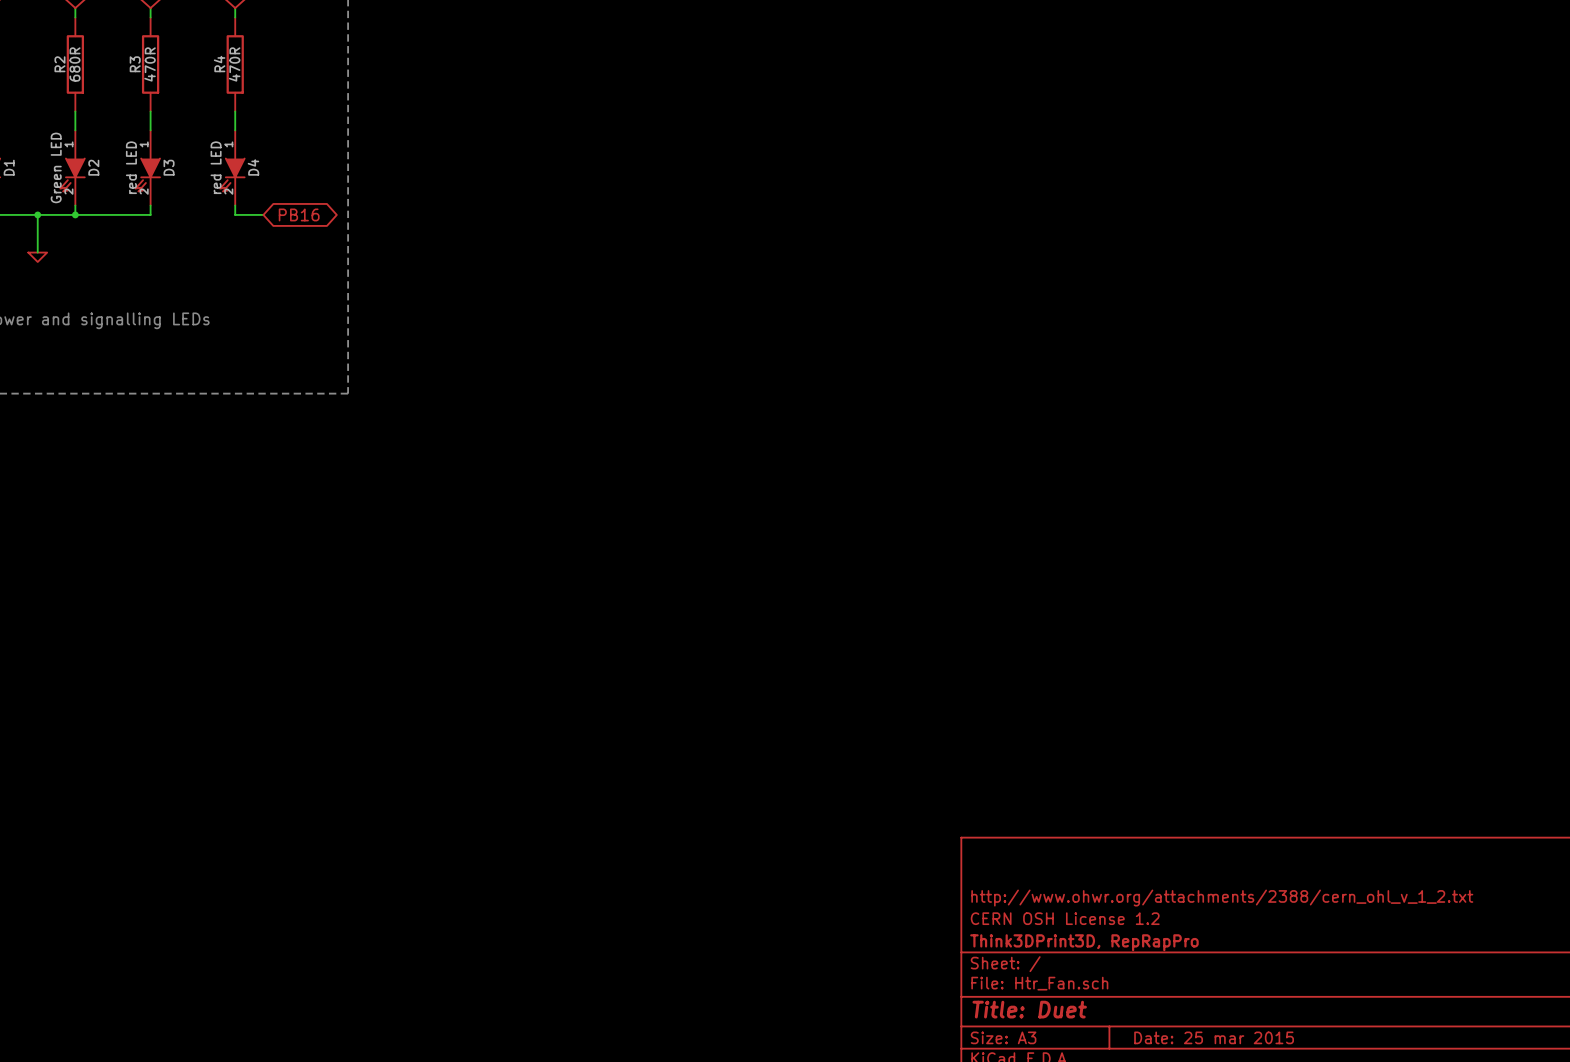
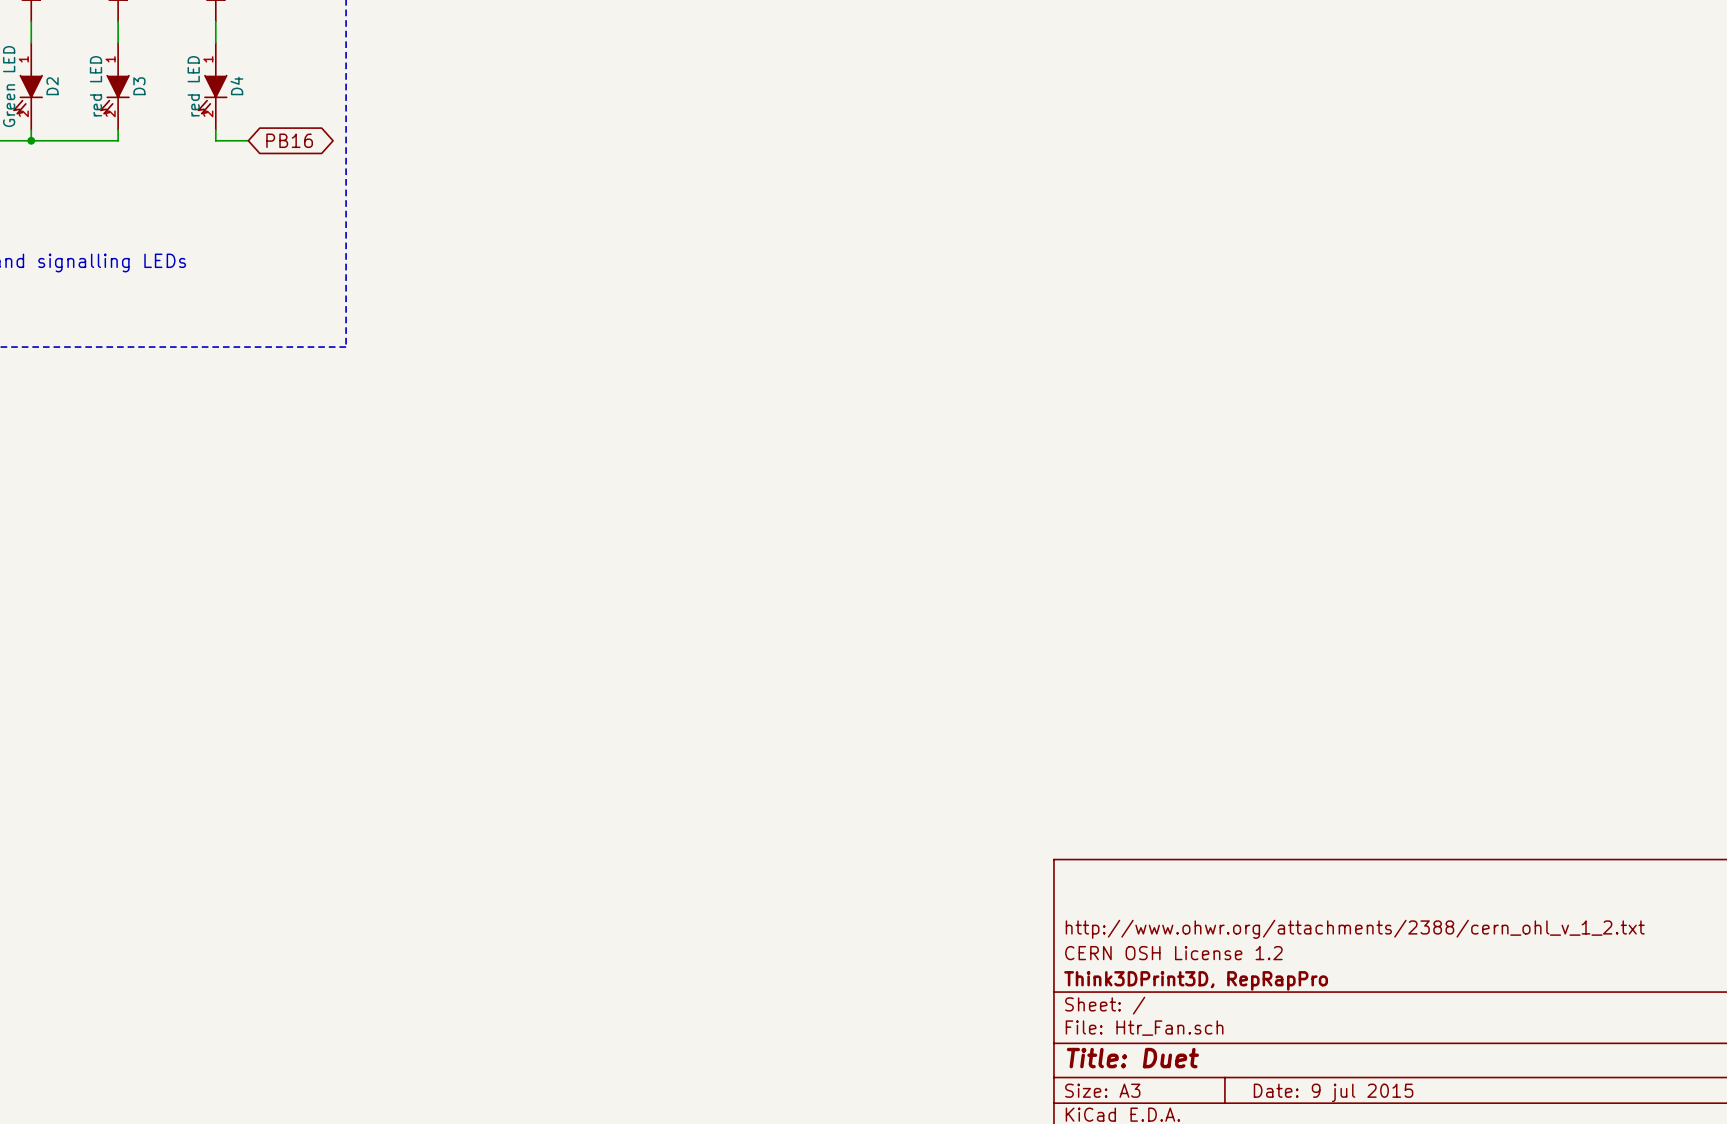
title block: Date: 25 mar 2015 (1214, 1037) -> Date: 9 jul 2015 (1333, 1092)

